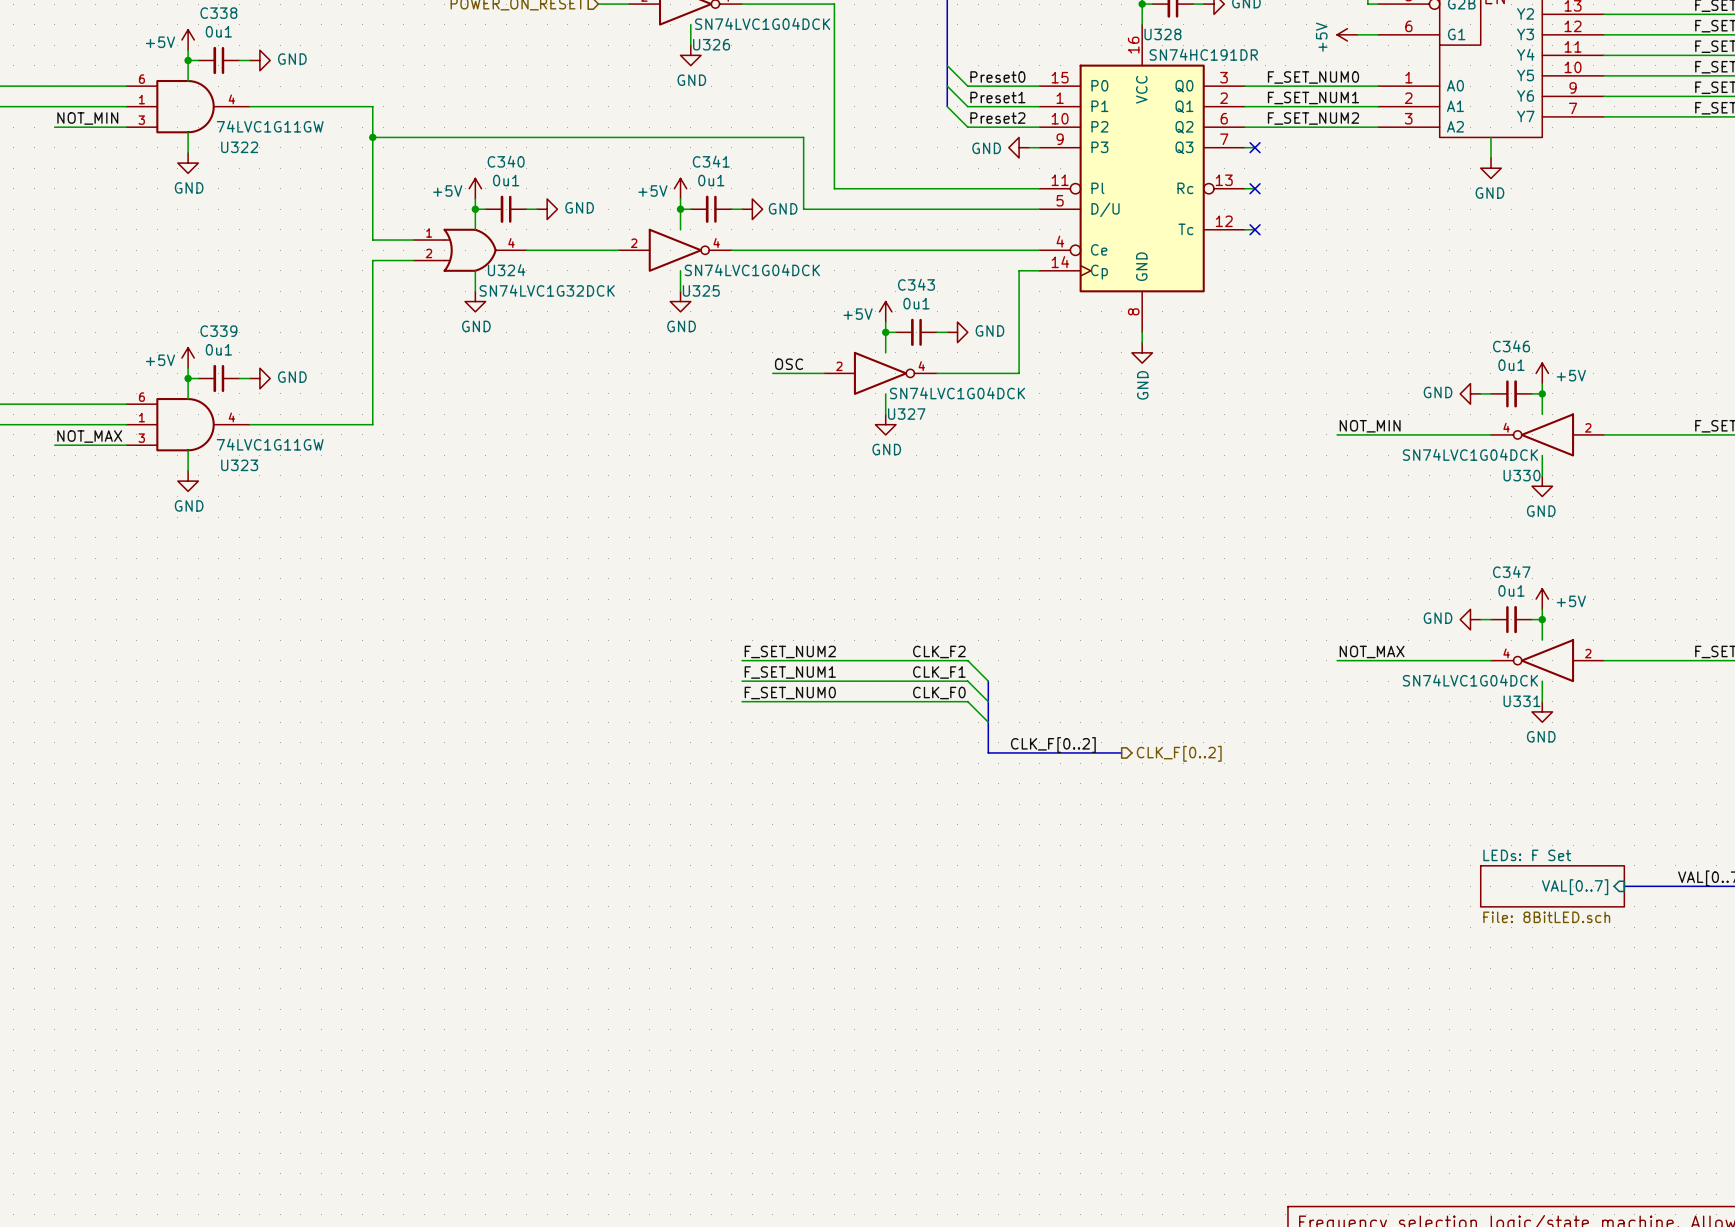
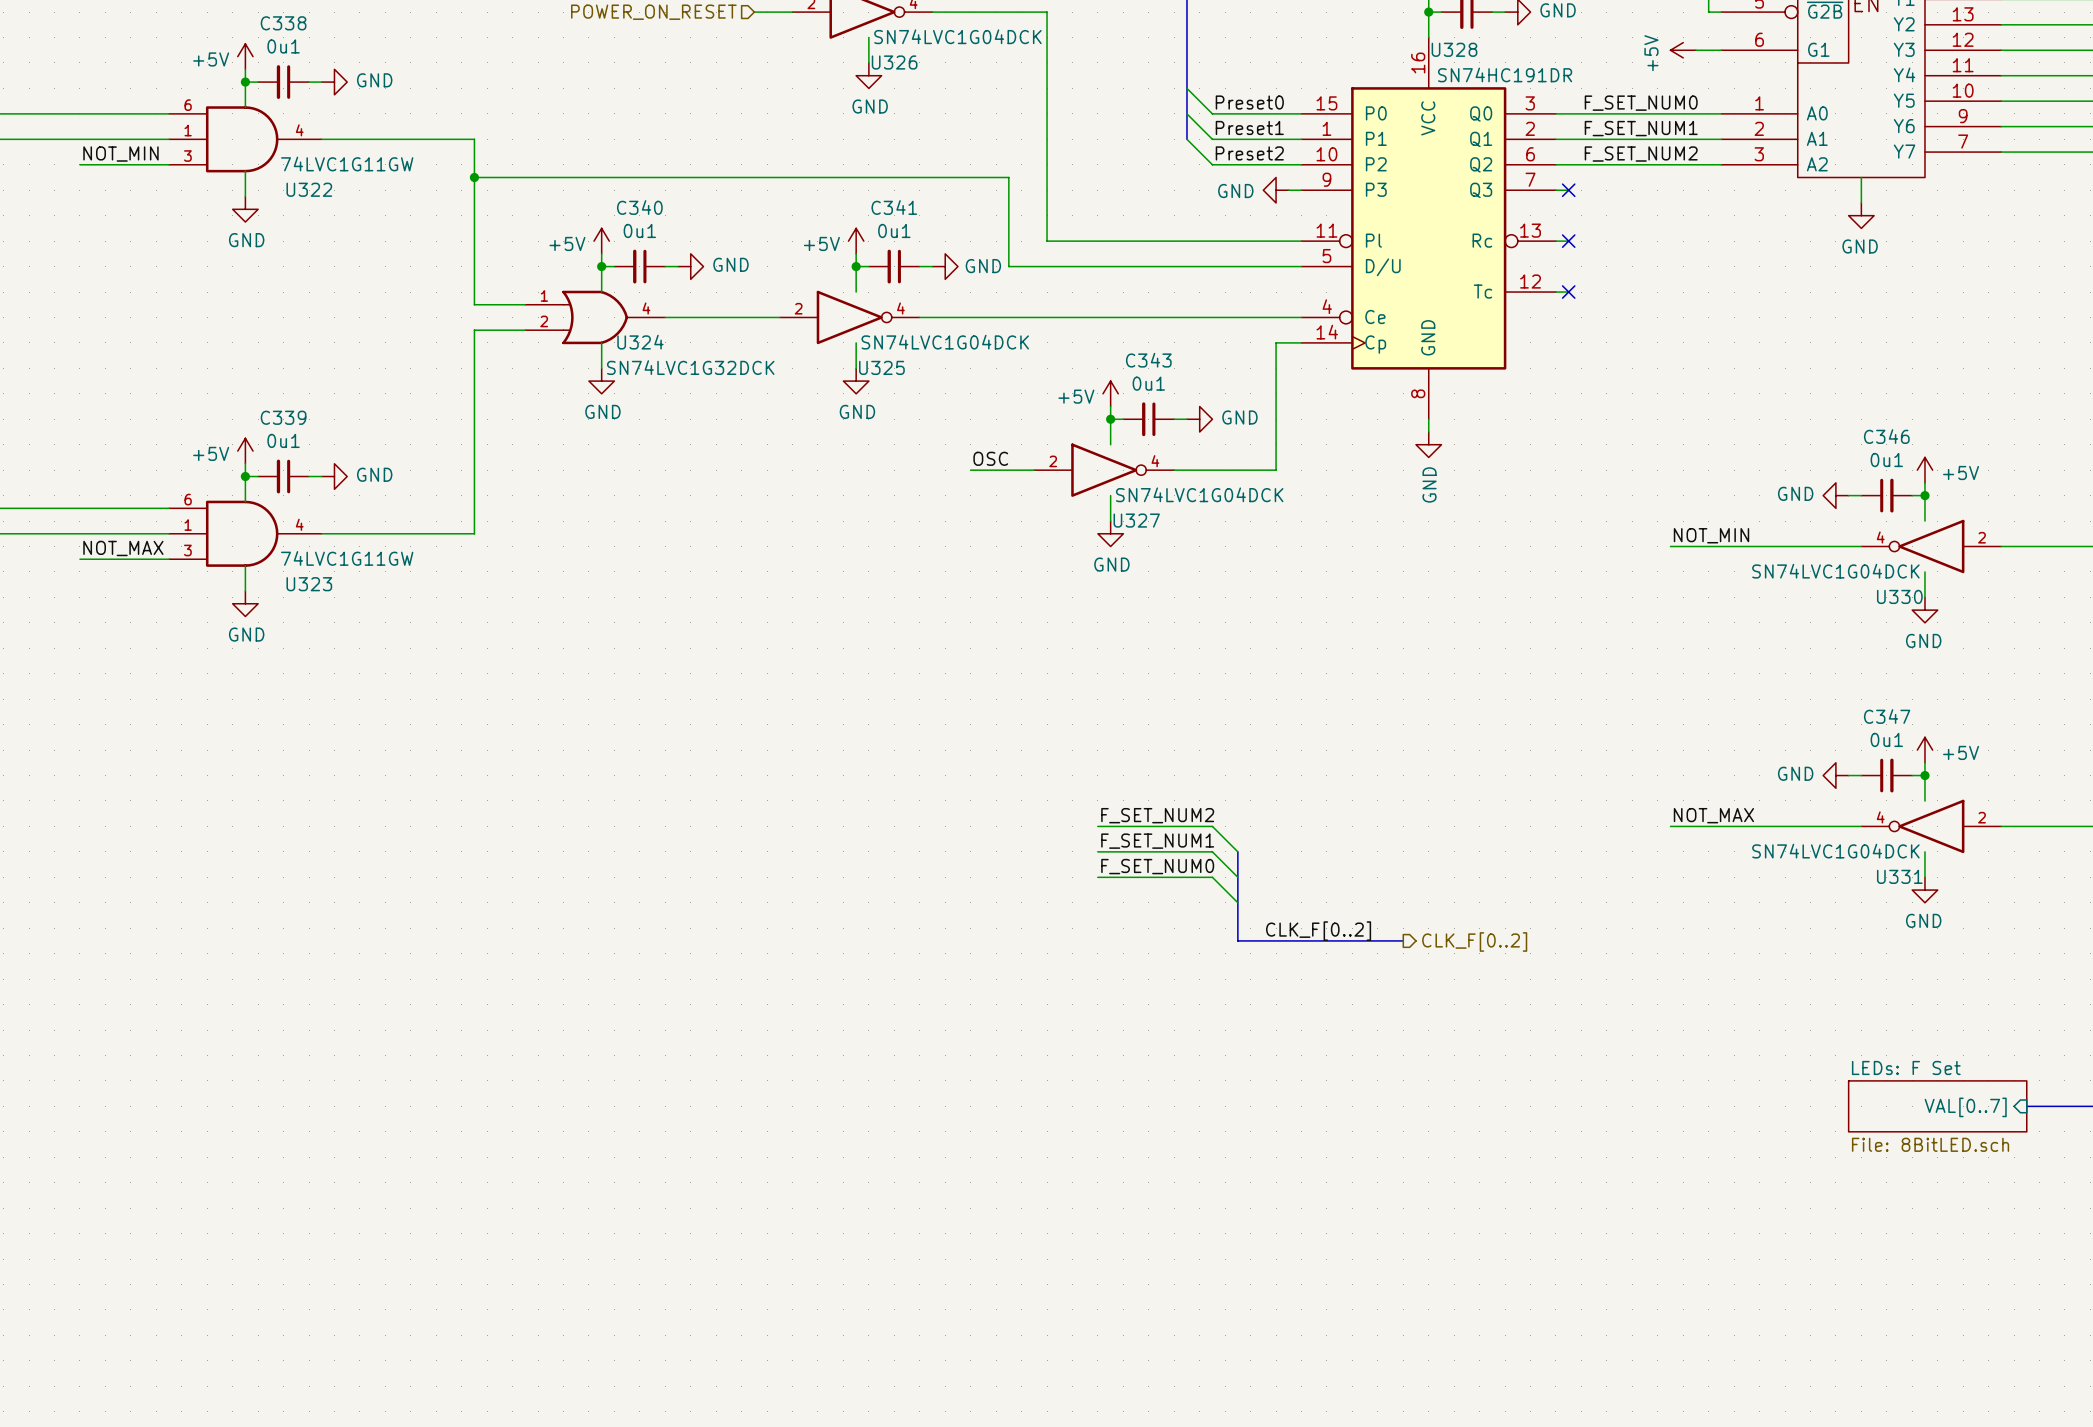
label position: F_SET_NUM2 (790, 651) -> F_SET_NUM2 (1157, 815)
label: CLK_F2 (939, 651) -> none
wire: (742, 660) (875, 660) -> none
label position: F_SET_NUM1 (790, 672) -> F_SET_NUM1 (1157, 841)
label: CLK_F1 (939, 672) -> none
wire: (742, 681) (875, 681) -> none
label position: F_SET_NUM0 (790, 693) -> F_SET_NUM0 (1157, 866)
label: CLK_F0 (939, 693) -> none
wire: (742, 701) (875, 701) -> none

